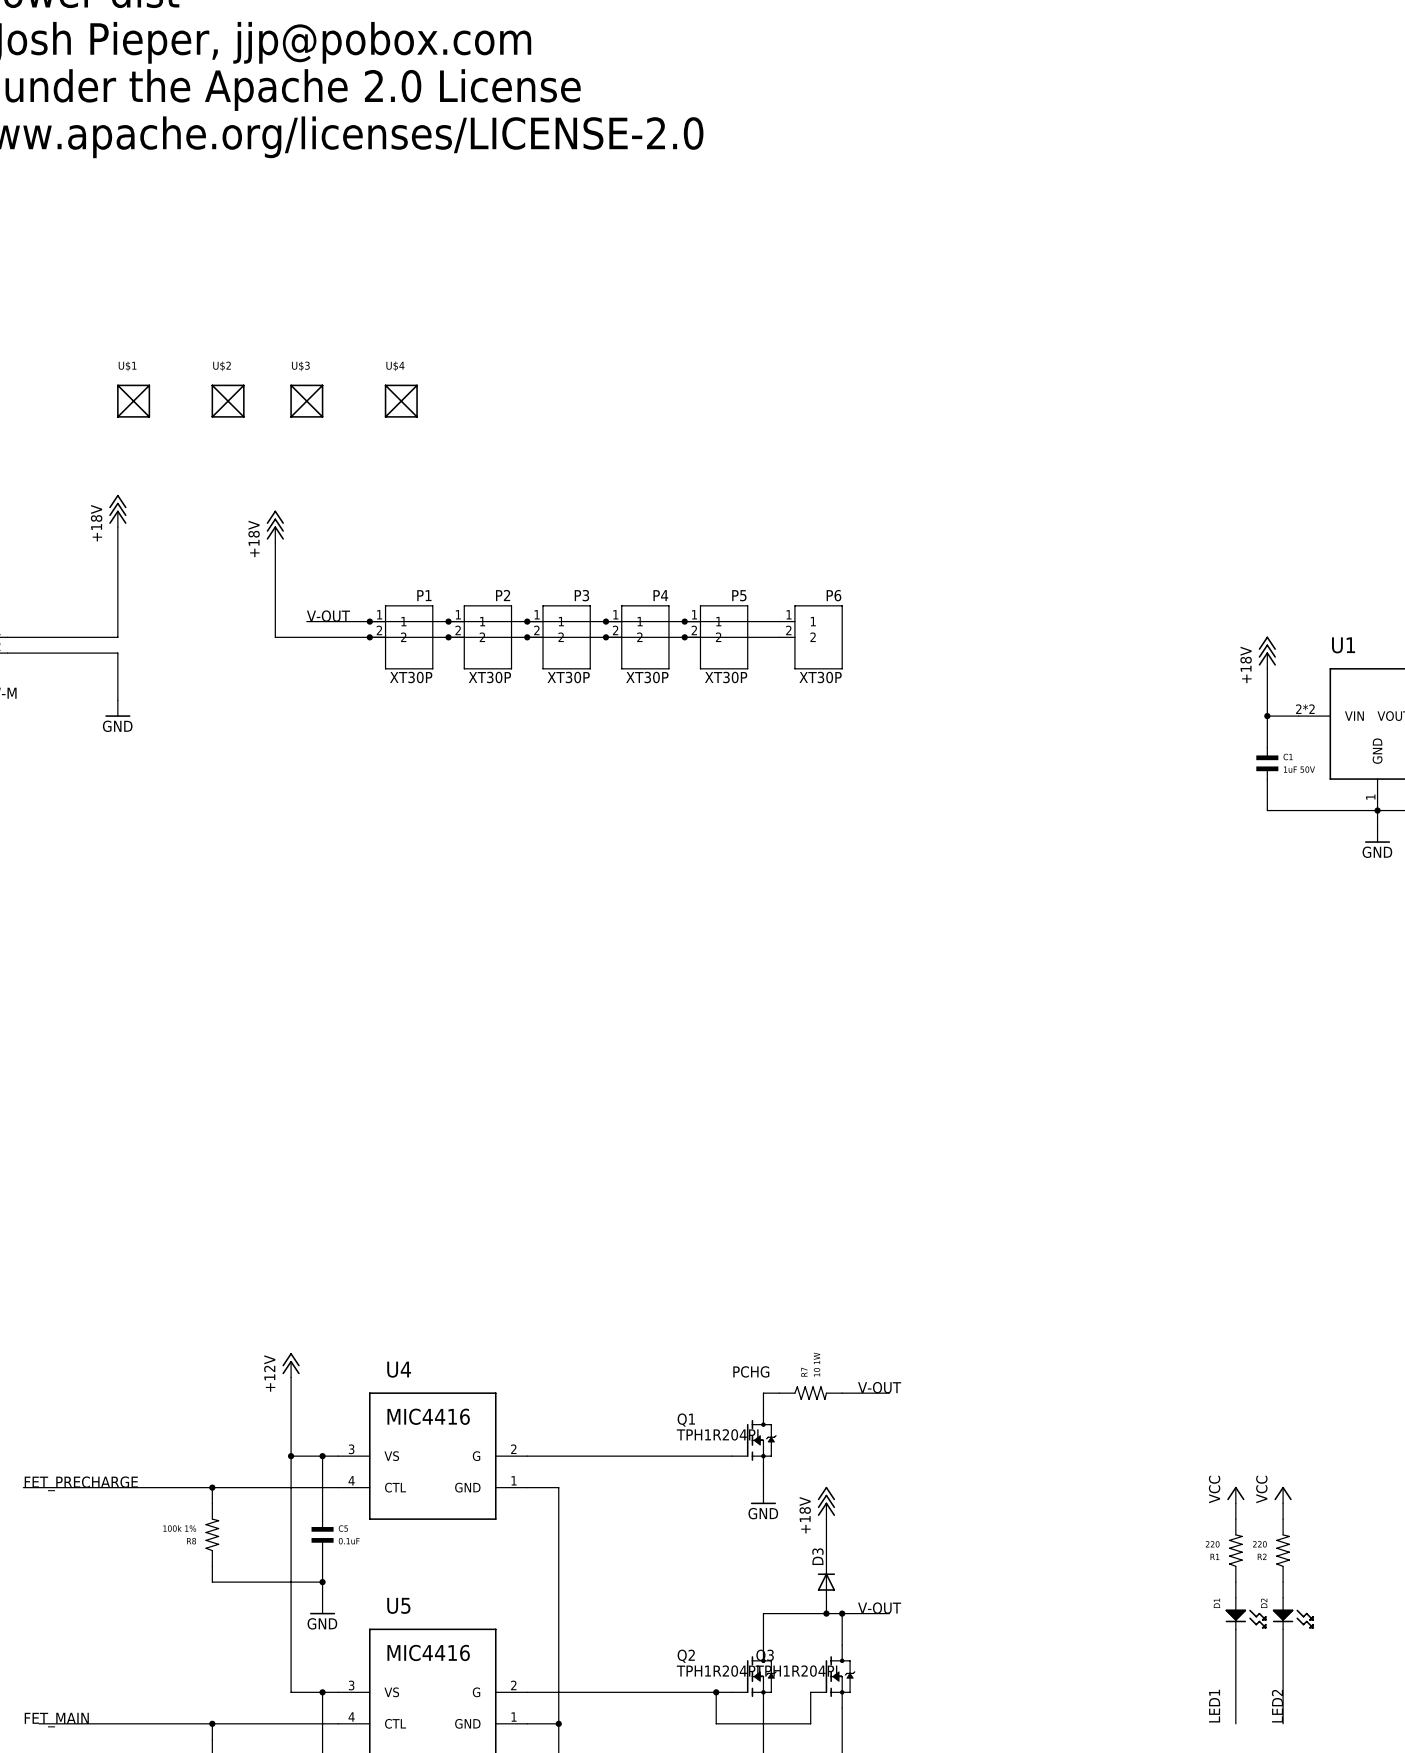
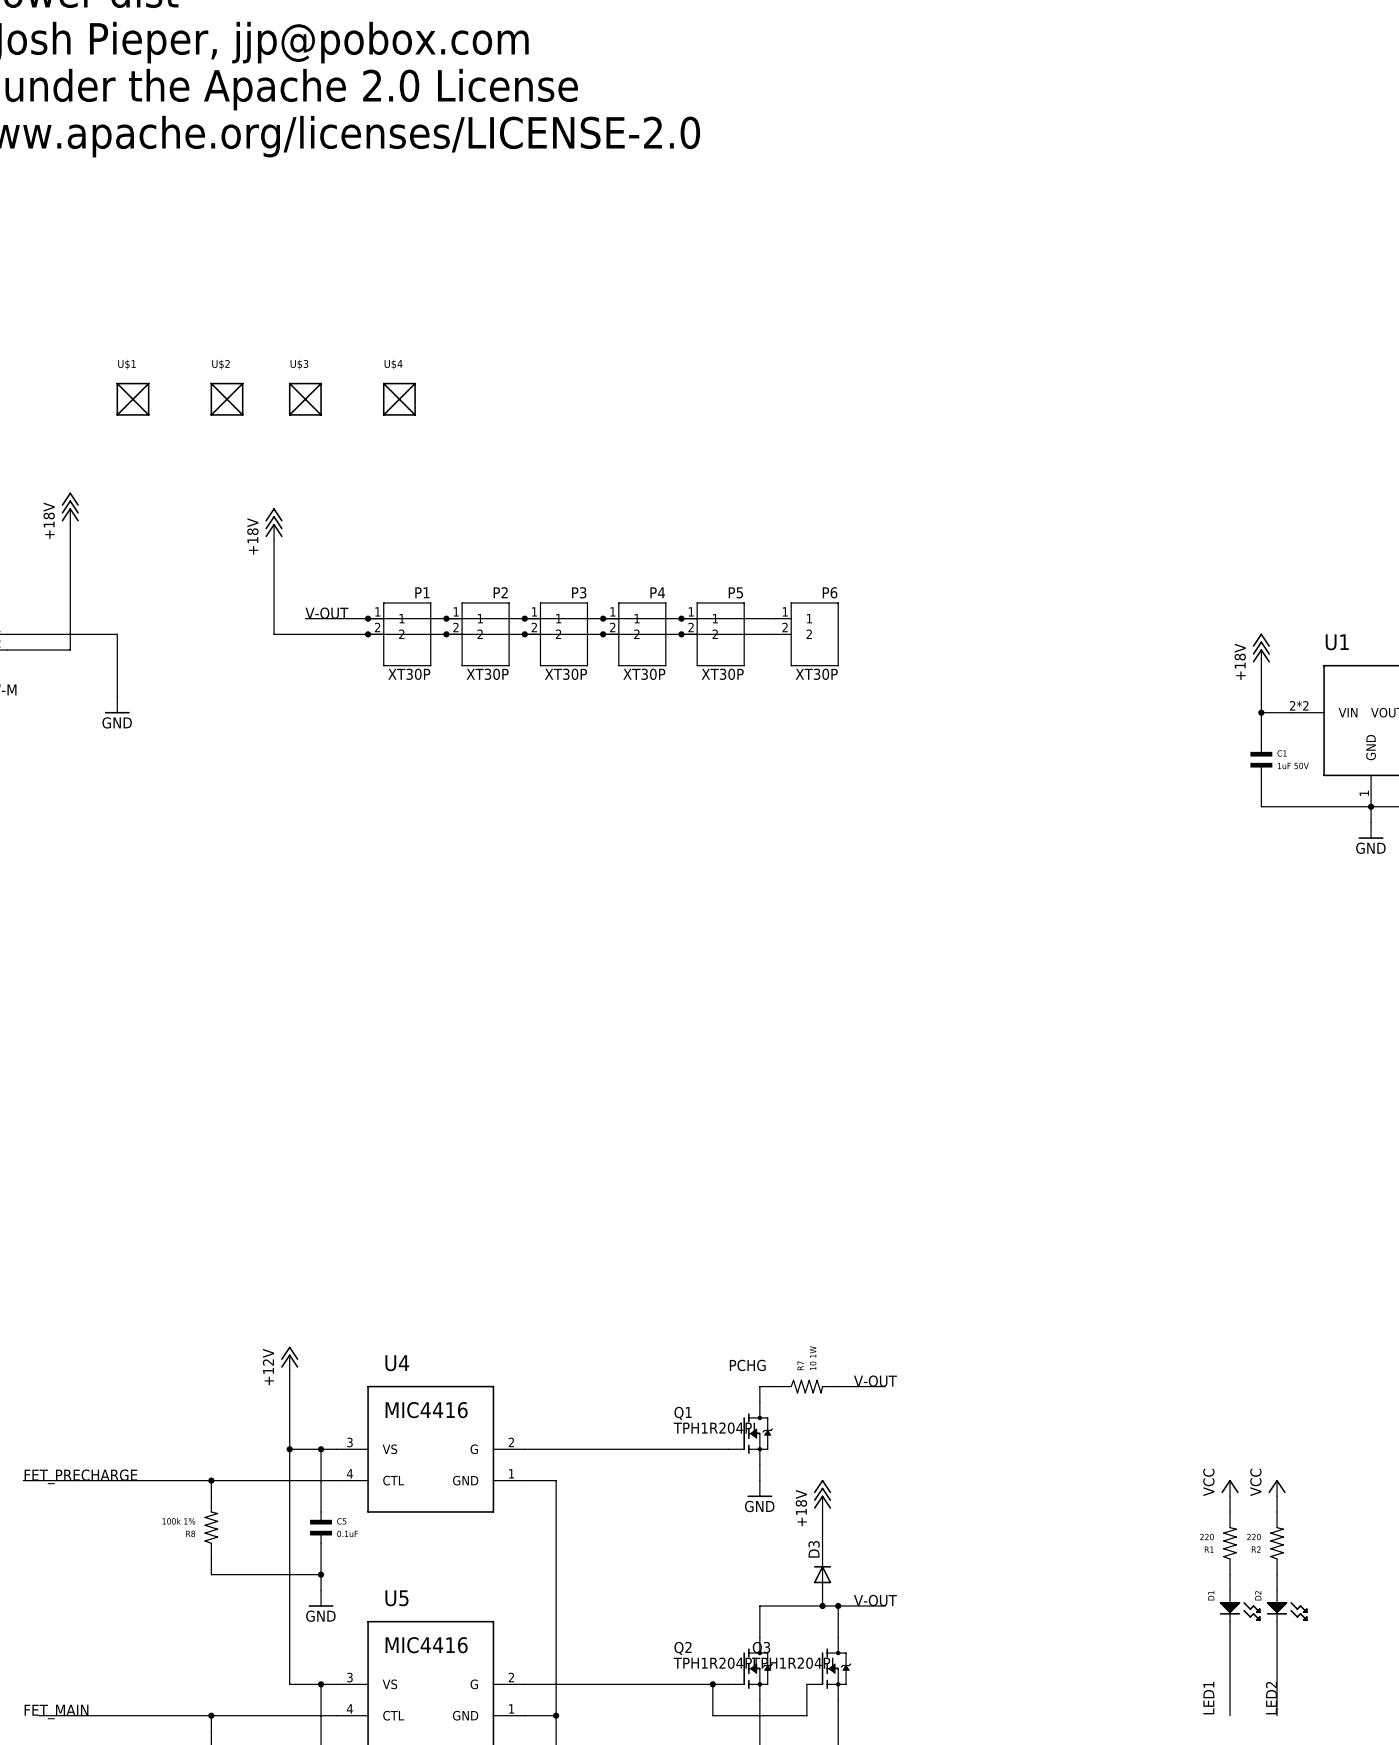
power symbol position: +18V (117, 510) -> +18V (70, 508)
wire: none -> (70, 524) (70, 650)
wire: (117, 527) (117, 637) -> none
wire: (70, 653) (117, 653) -> (117, 634) (117, 650)

